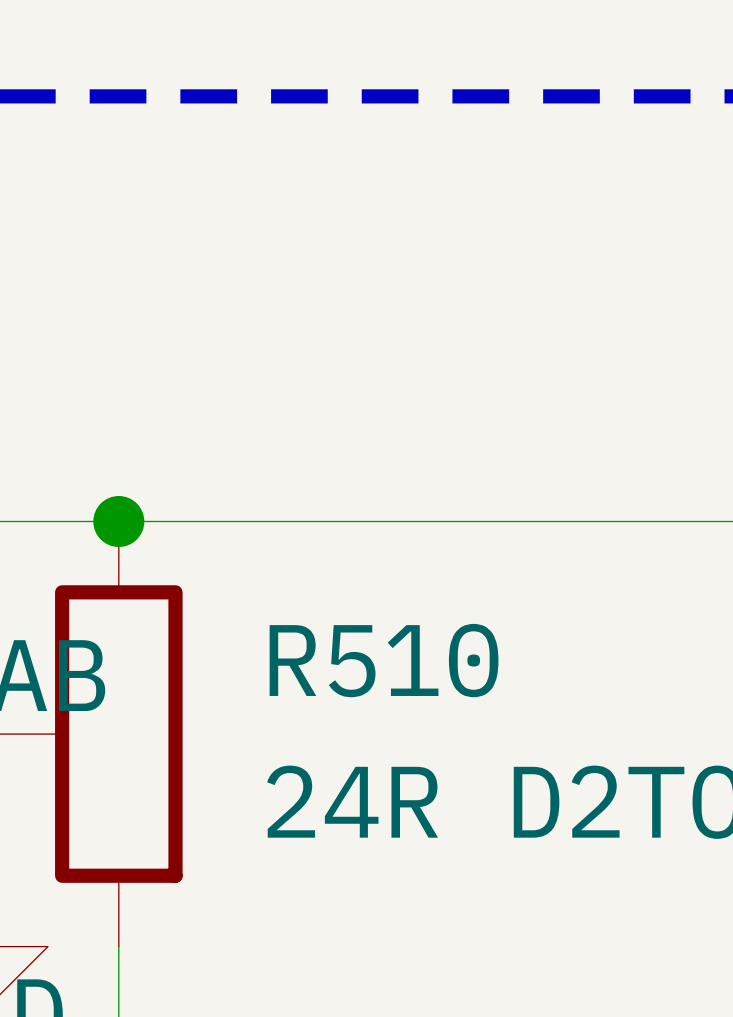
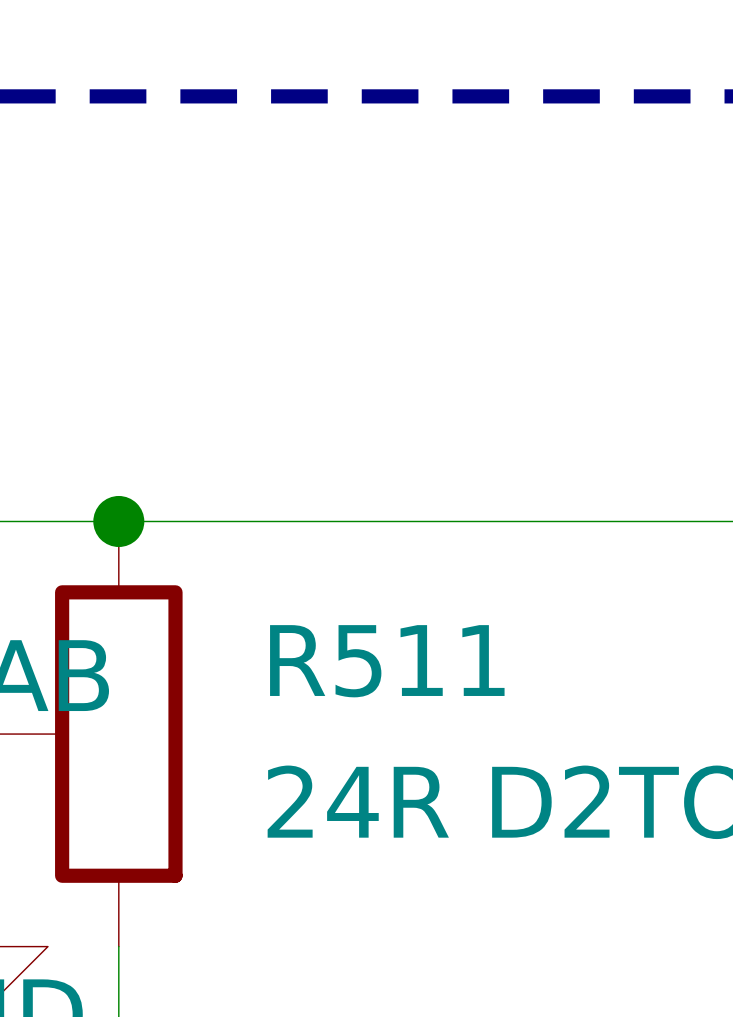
R510 name: R510 (384, 660) -> R511 (387, 661)

